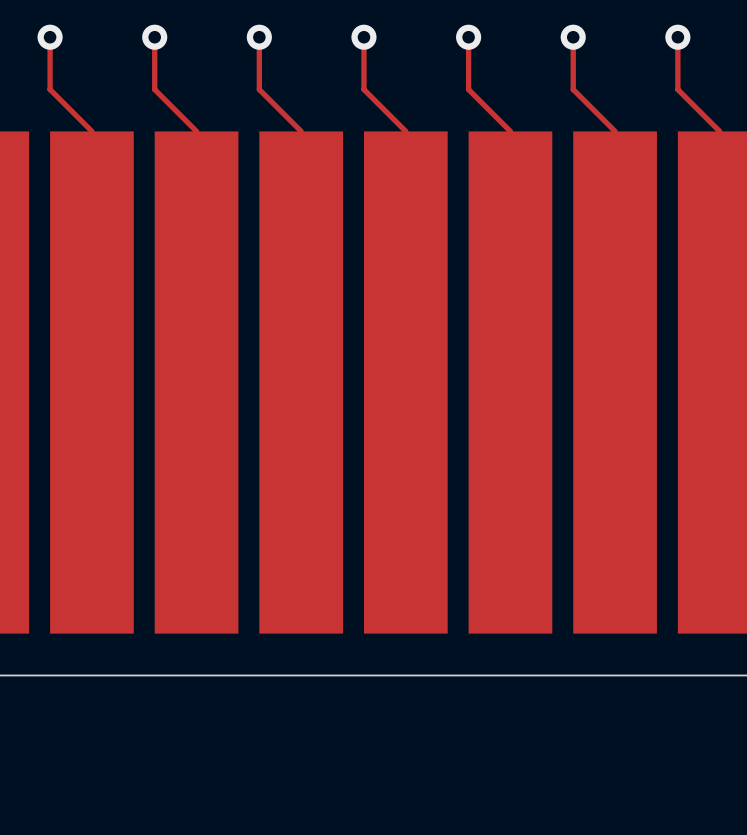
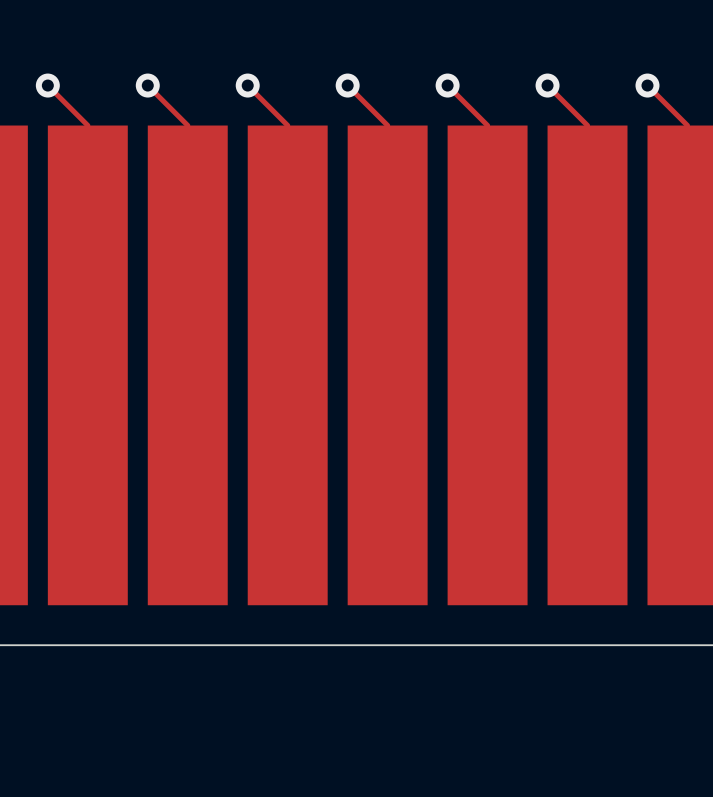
track: (50, 37) (50, 89) -> none
via position: (50, 37) -> (47, 85)
track: (154, 37) (154, 89) -> none
via position: (154, 37) -> (147, 85)
track: (259, 37) (259, 89) -> none
via position: (259, 37) -> (247, 85)
track: (363, 37) (363, 89) -> none
via position: (363, 37) -> (347, 85)
track: (468, 37) (468, 89) -> none
via position: (468, 37) -> (447, 85)
track: (573, 37) (573, 89) -> none
via position: (573, 37) -> (547, 85)
track: (677, 37) (677, 89) -> none
via position: (677, 37) -> (647, 85)

